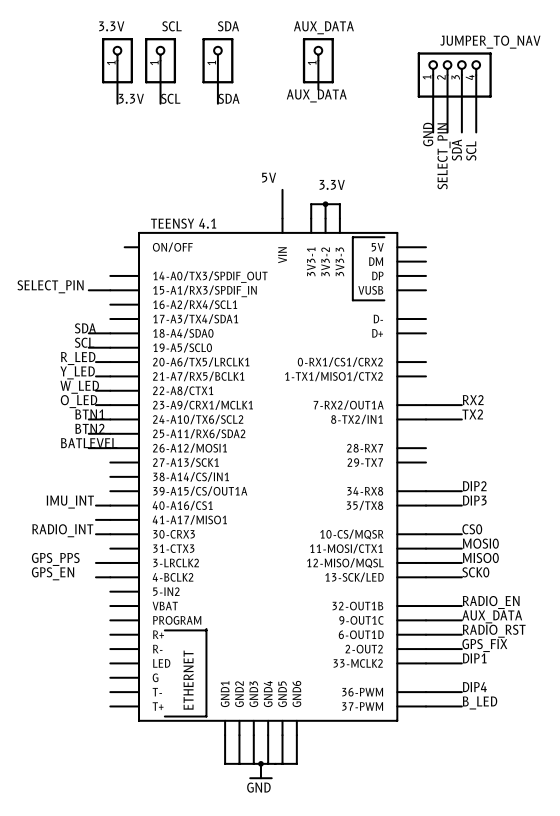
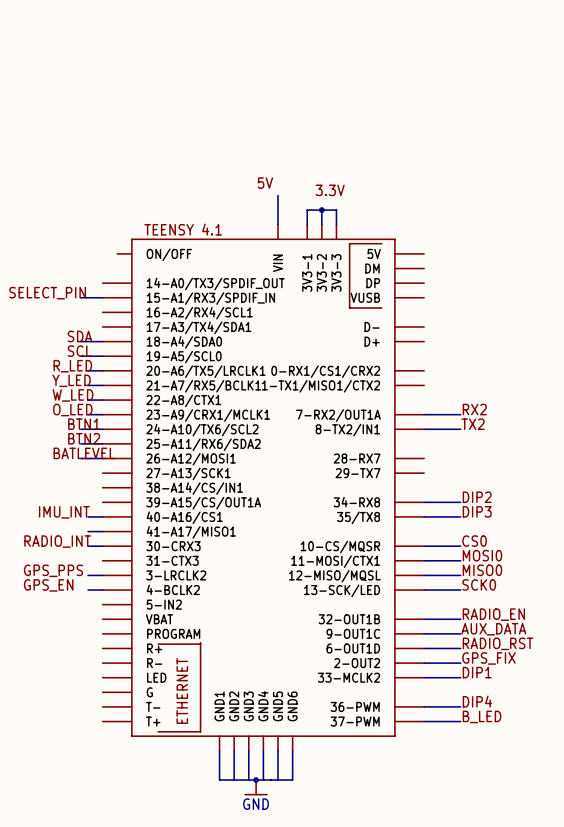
wire: (117, 60) (117, 103) -> none
3.3V: (117, 60) -> none
wire: (160, 60) (160, 103) -> none
SCL: (160, 60) -> none
wire: (217, 60) (217, 103) -> none
SDA: (217, 60) -> none
wire: (318, 60) (318, 89) -> none
AUX_DATA: (318, 60) -> none
wire: (433, 75) (433, 132) -> none
wire: (447, 75) (447, 132) -> none
JUMPER_TO_NAV: (454, 75) -> none
wire: (461, 75) (461, 132) -> none
wire: (476, 75) (476, 132) -> none
label: AUX_DATA (316, 95) -> none
label: 3.3V (131, 98) -> none
label: SCL (170, 98) -> none
label: SDA (228, 98) -> none
label: GND (428, 134) -> none
label: SDA (456, 150) -> none
label: SCL (471, 150) -> none
label: SELECT_PIN (444, 156) -> none

